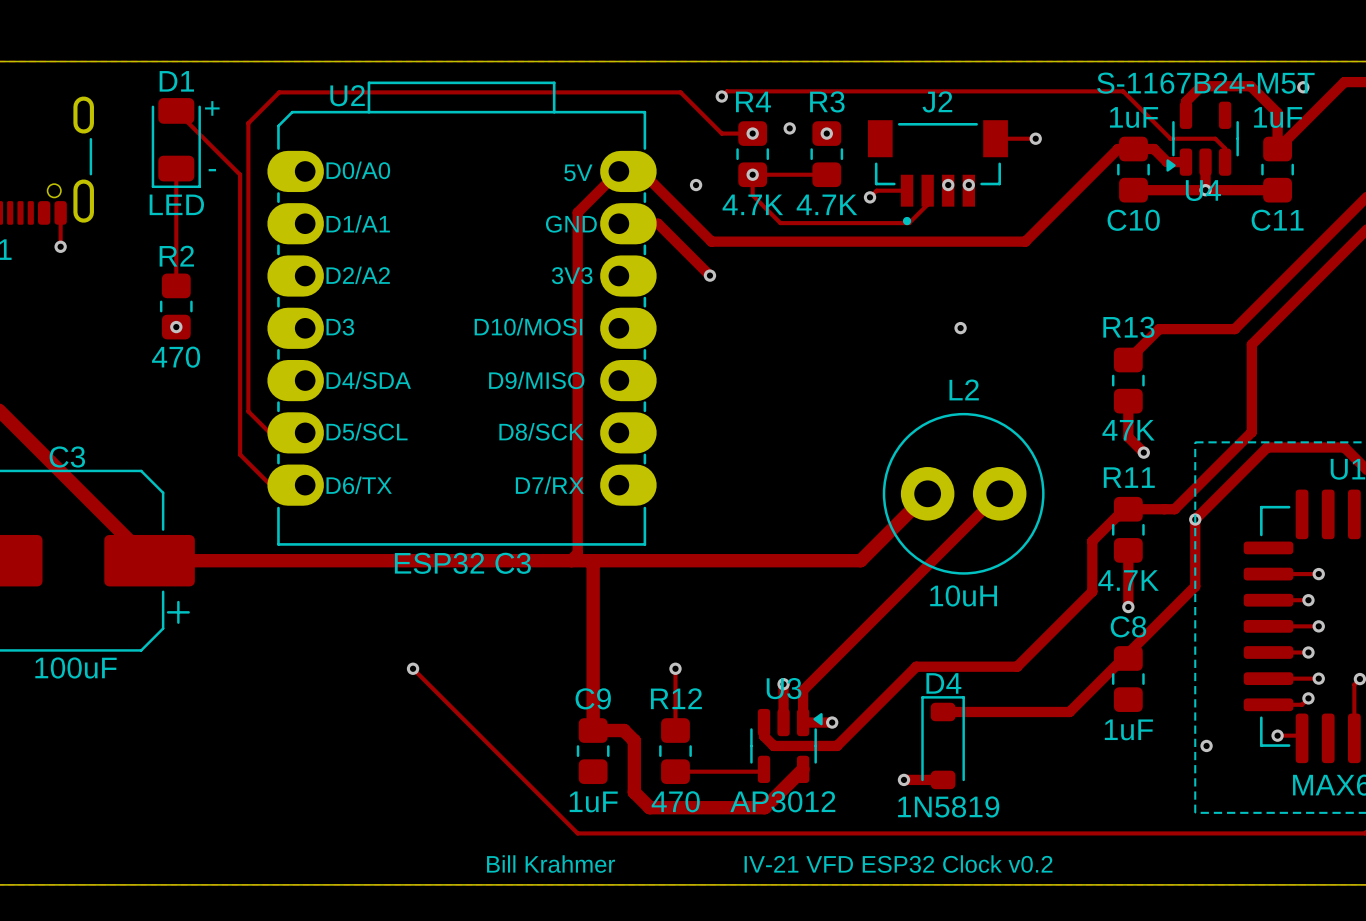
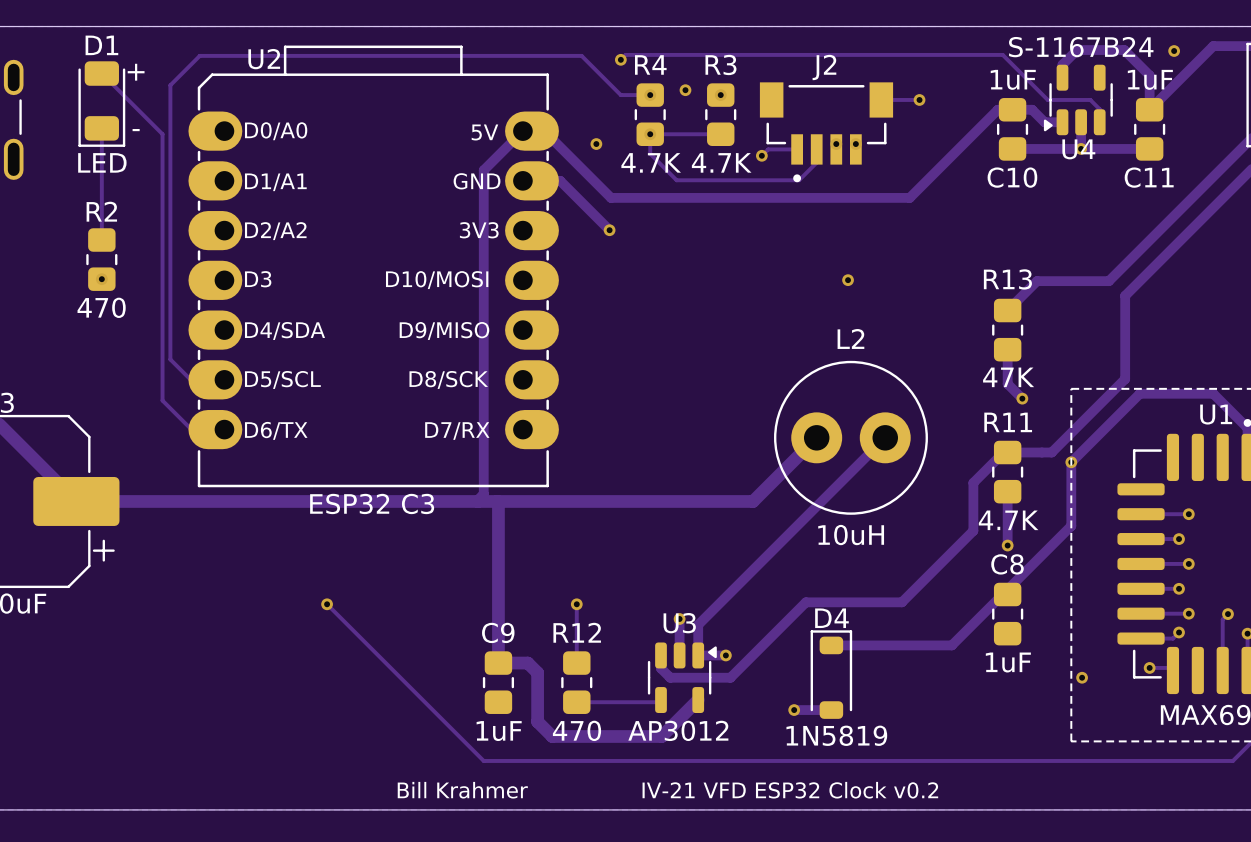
U4 value: S-1167B24-M5T (1205, 83) -> S-1167B24 (1081, 47)

